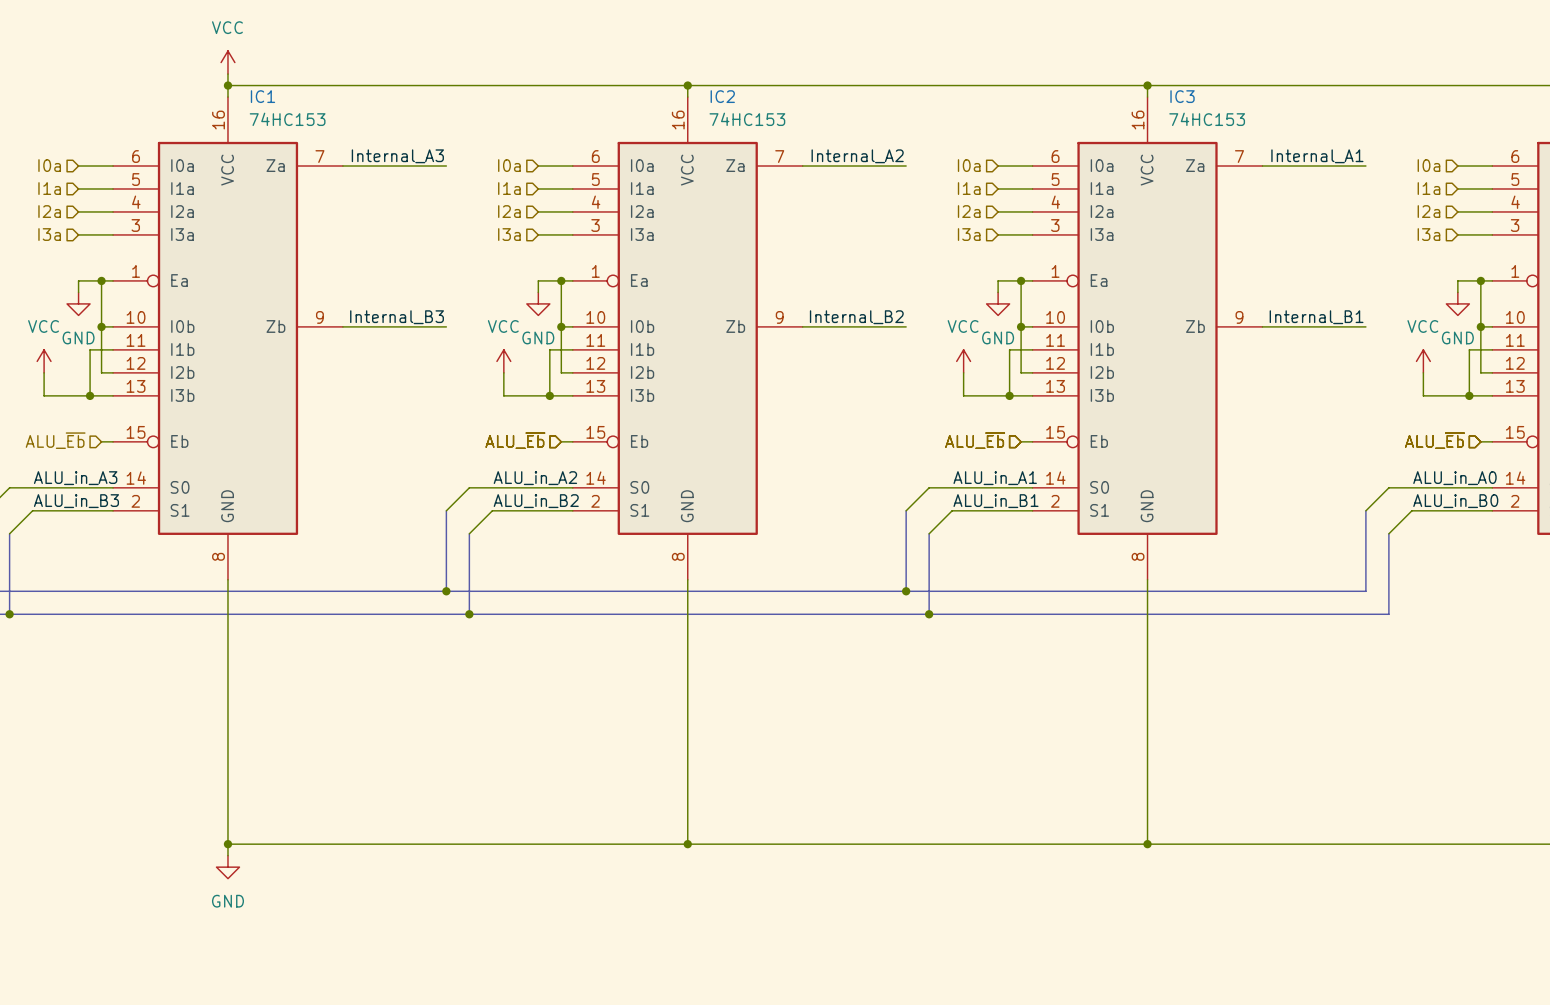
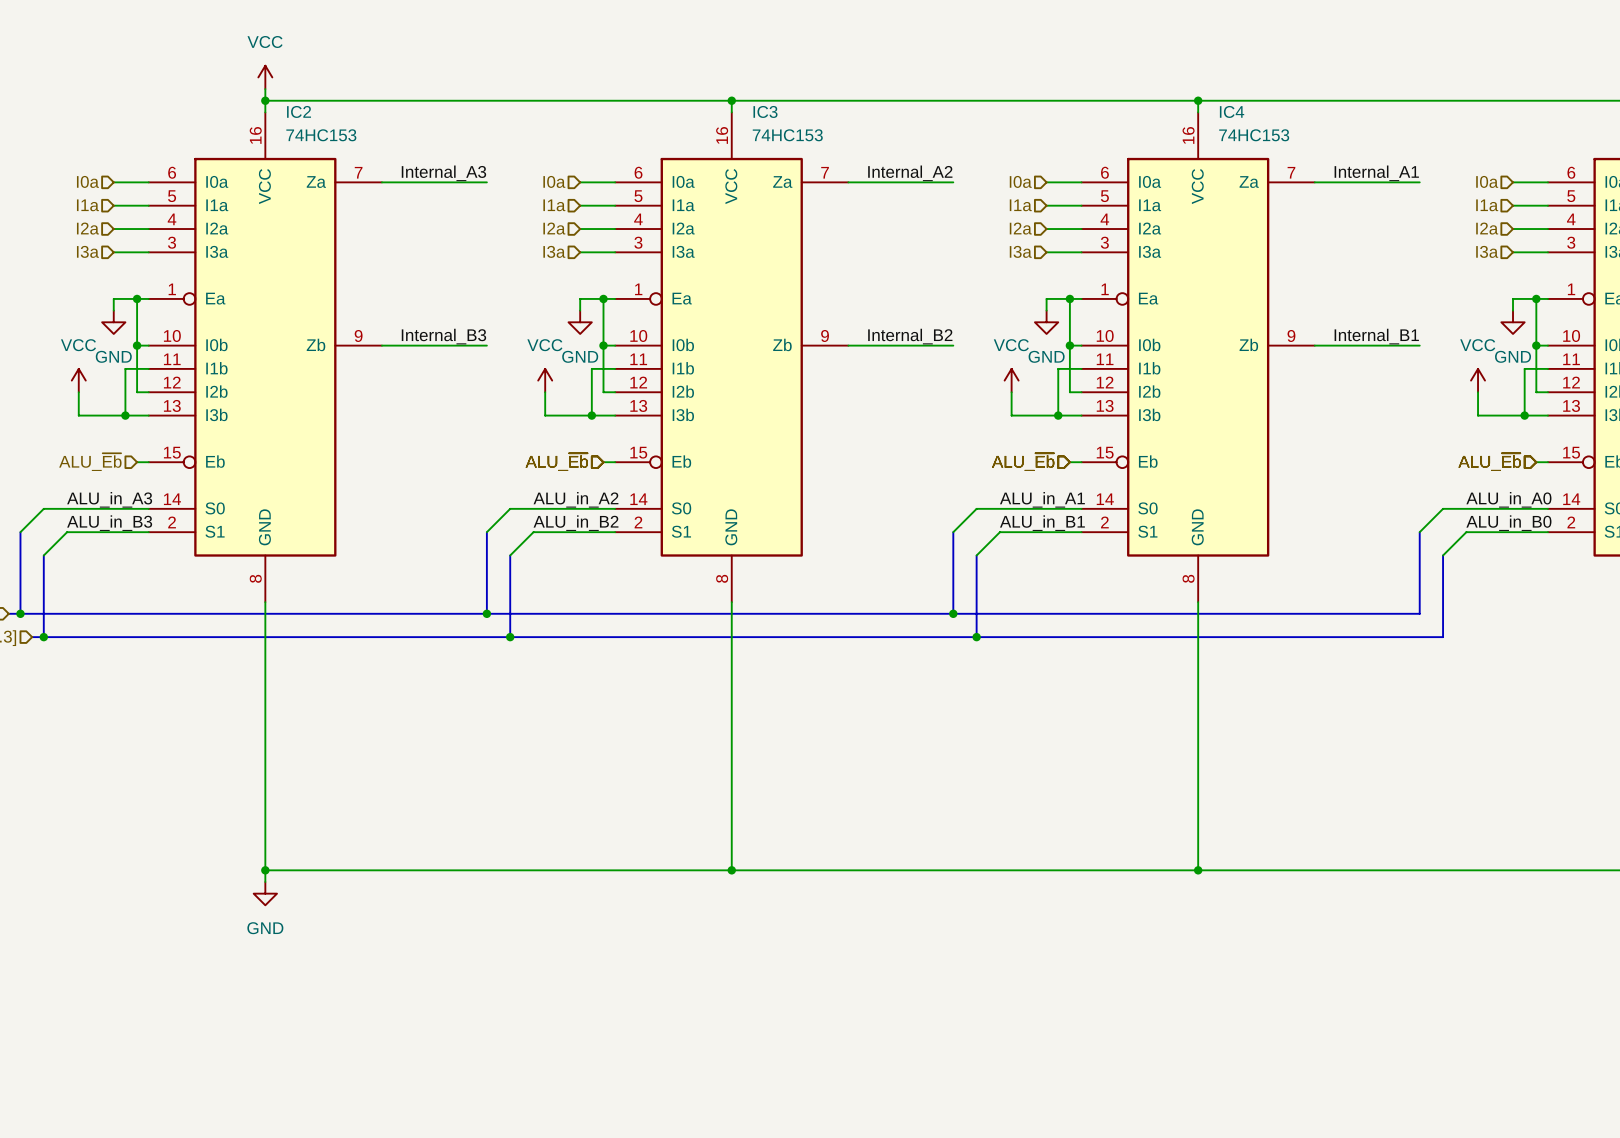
IC1 name: IC1 (262, 96) -> IC2 (299, 111)
IC2 name: IC2 (722, 96) -> IC3 (765, 111)
IC3 name: IC3 (1182, 96) -> IC4 (1232, 111)

